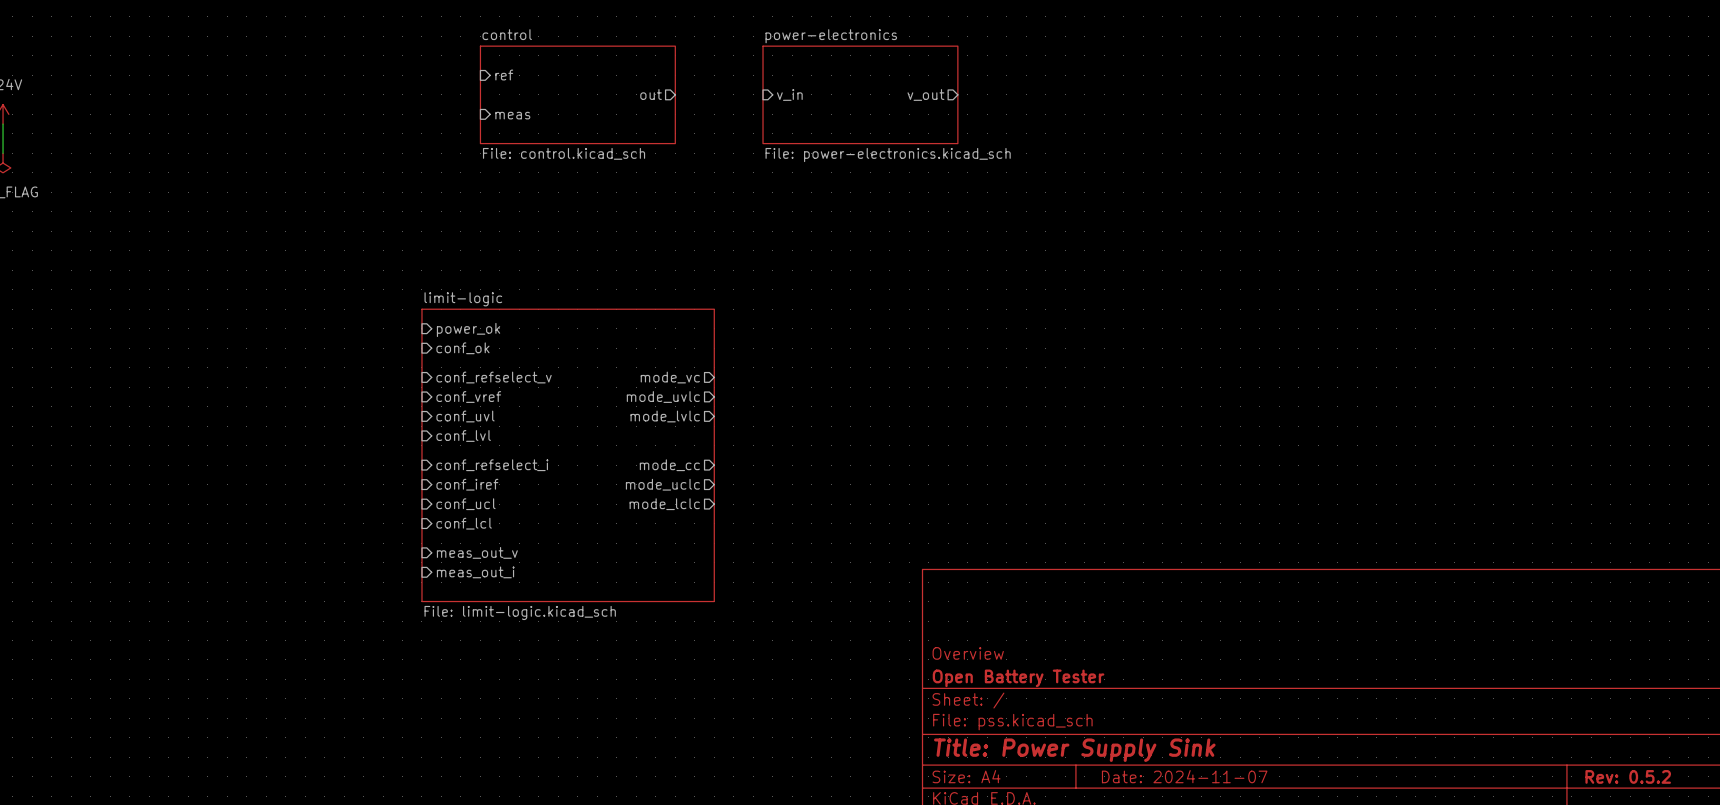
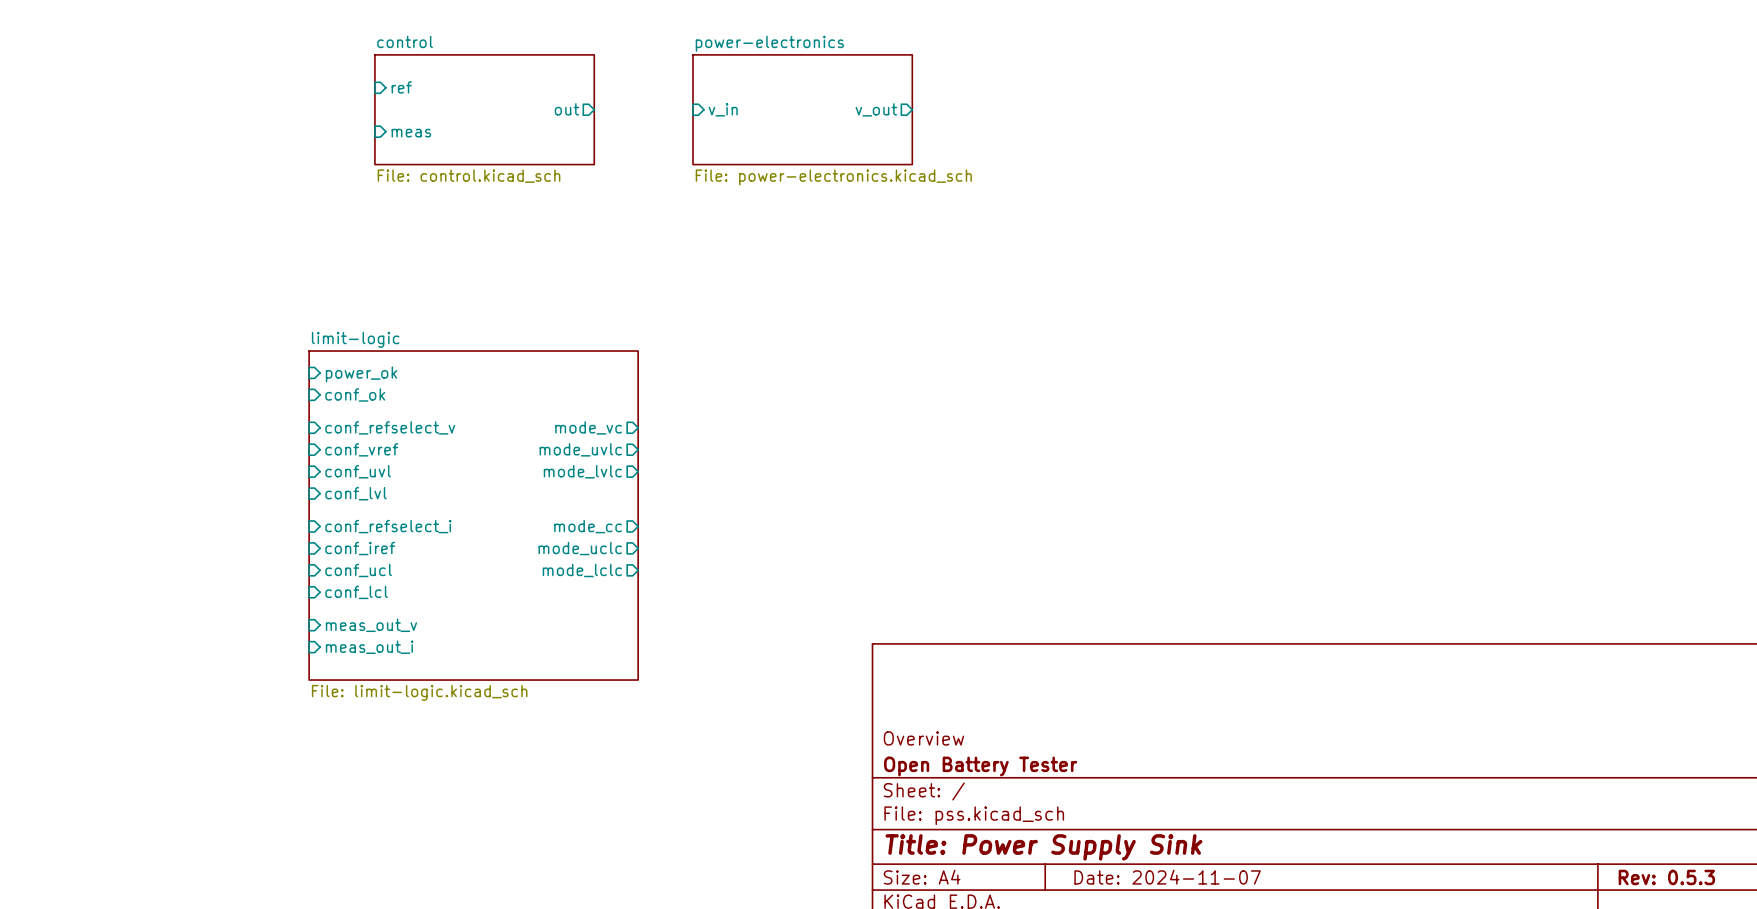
title block: Rev: 0.5.2 (1628, 776) -> Rev: 0.5.3 (1666, 877)

